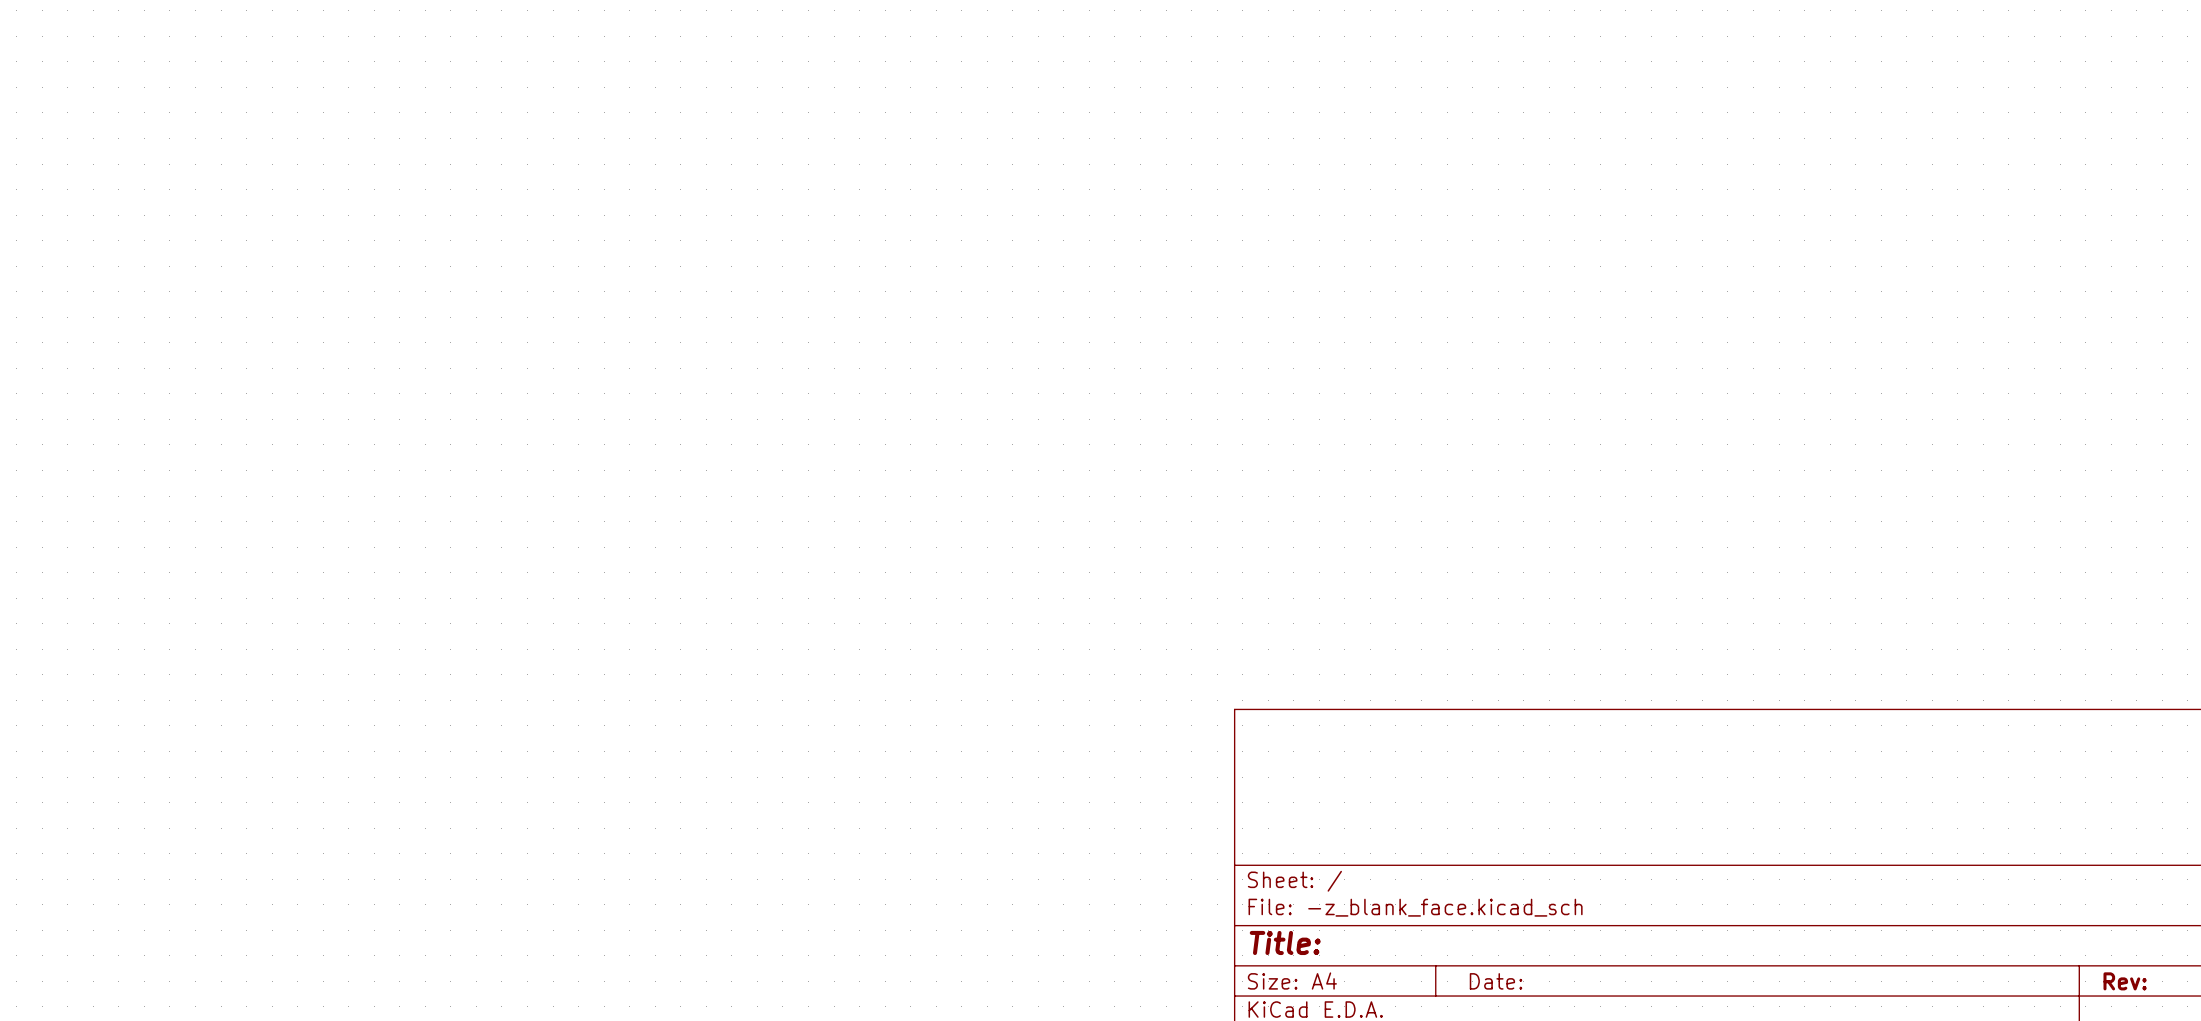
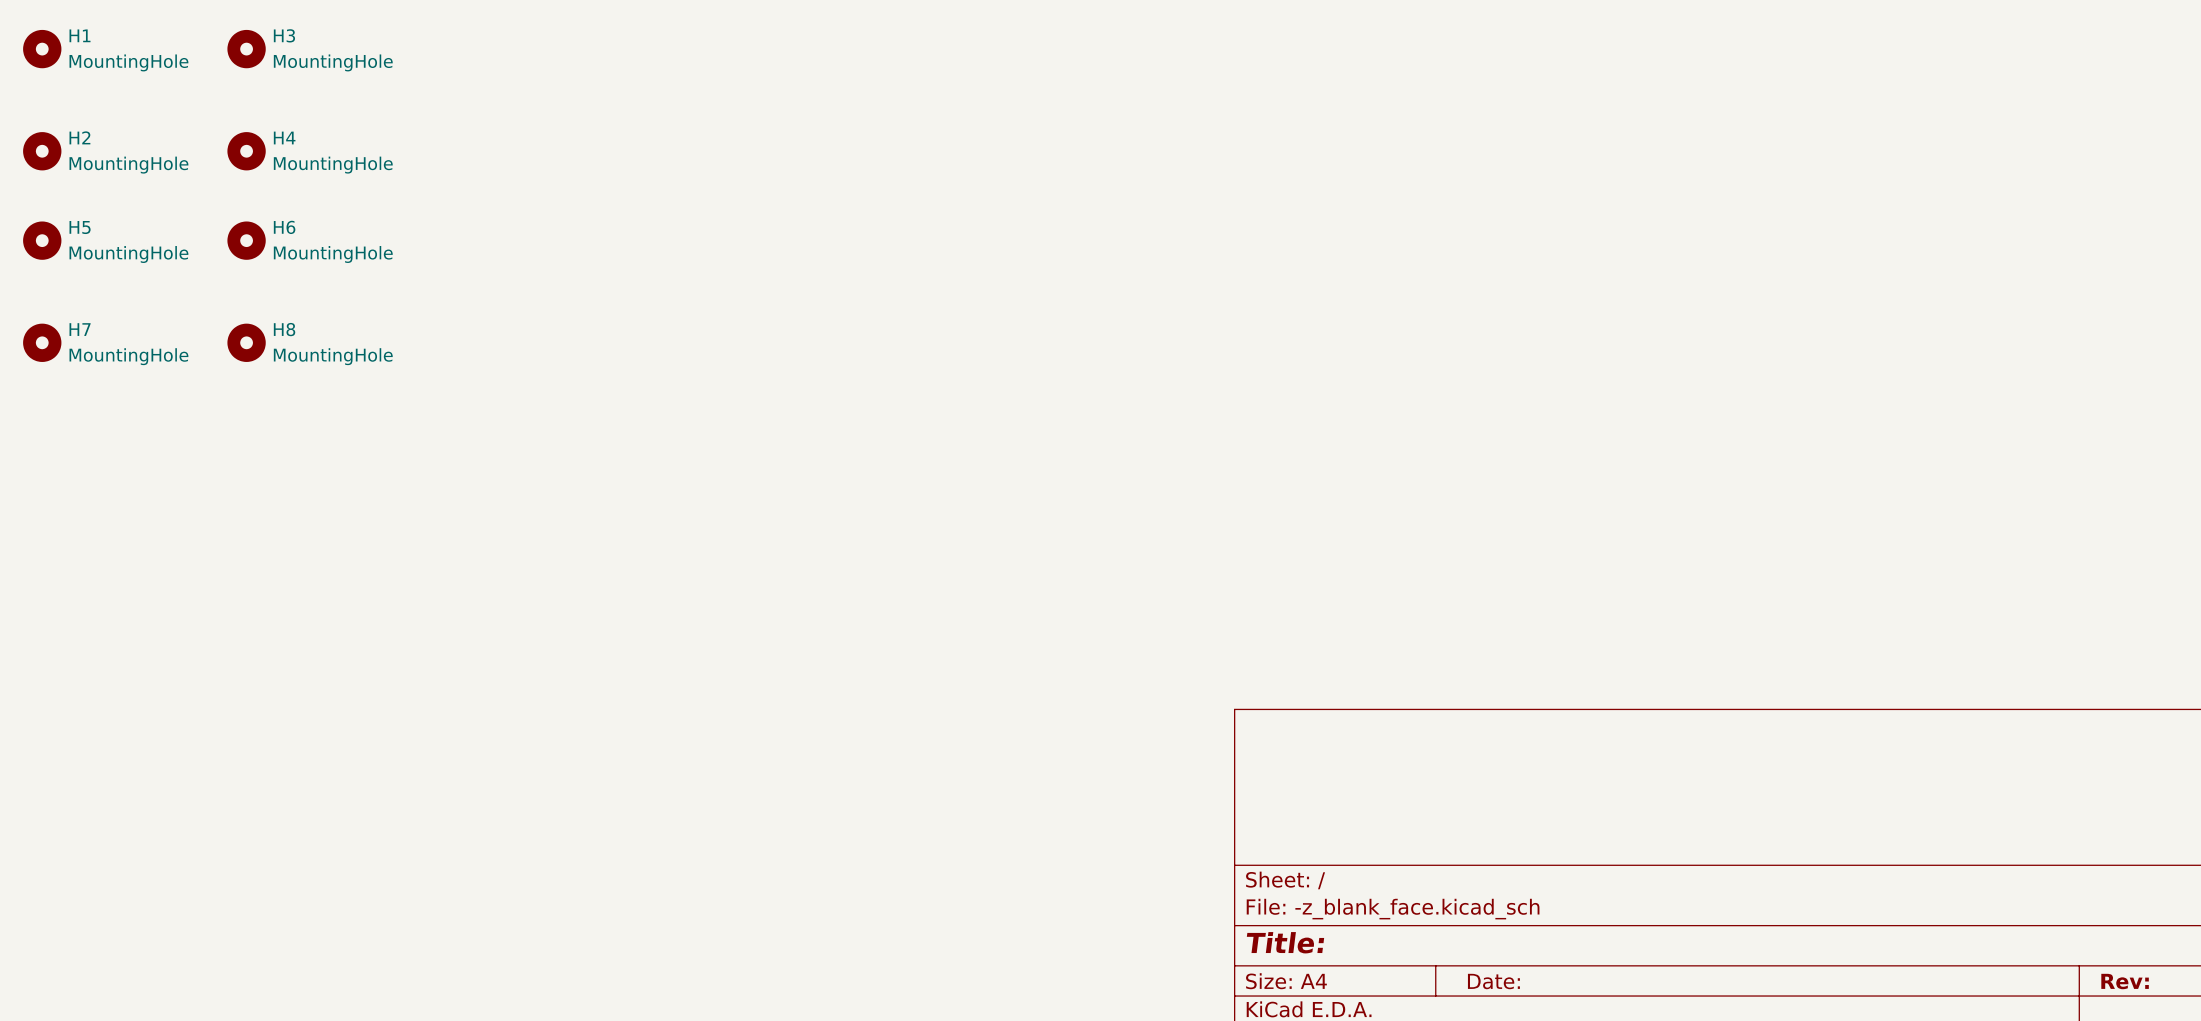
H1: none -> MountingHole (42, 49)
H3: none -> MountingHole (246, 49)
H2: none -> MountingHole (42, 151)
H4: none -> MountingHole (246, 151)
H5: none -> MountingHole (42, 240)
H6: none -> MountingHole (246, 240)
H7: none -> MountingHole (42, 342)
H8: none -> MountingHole (246, 342)

